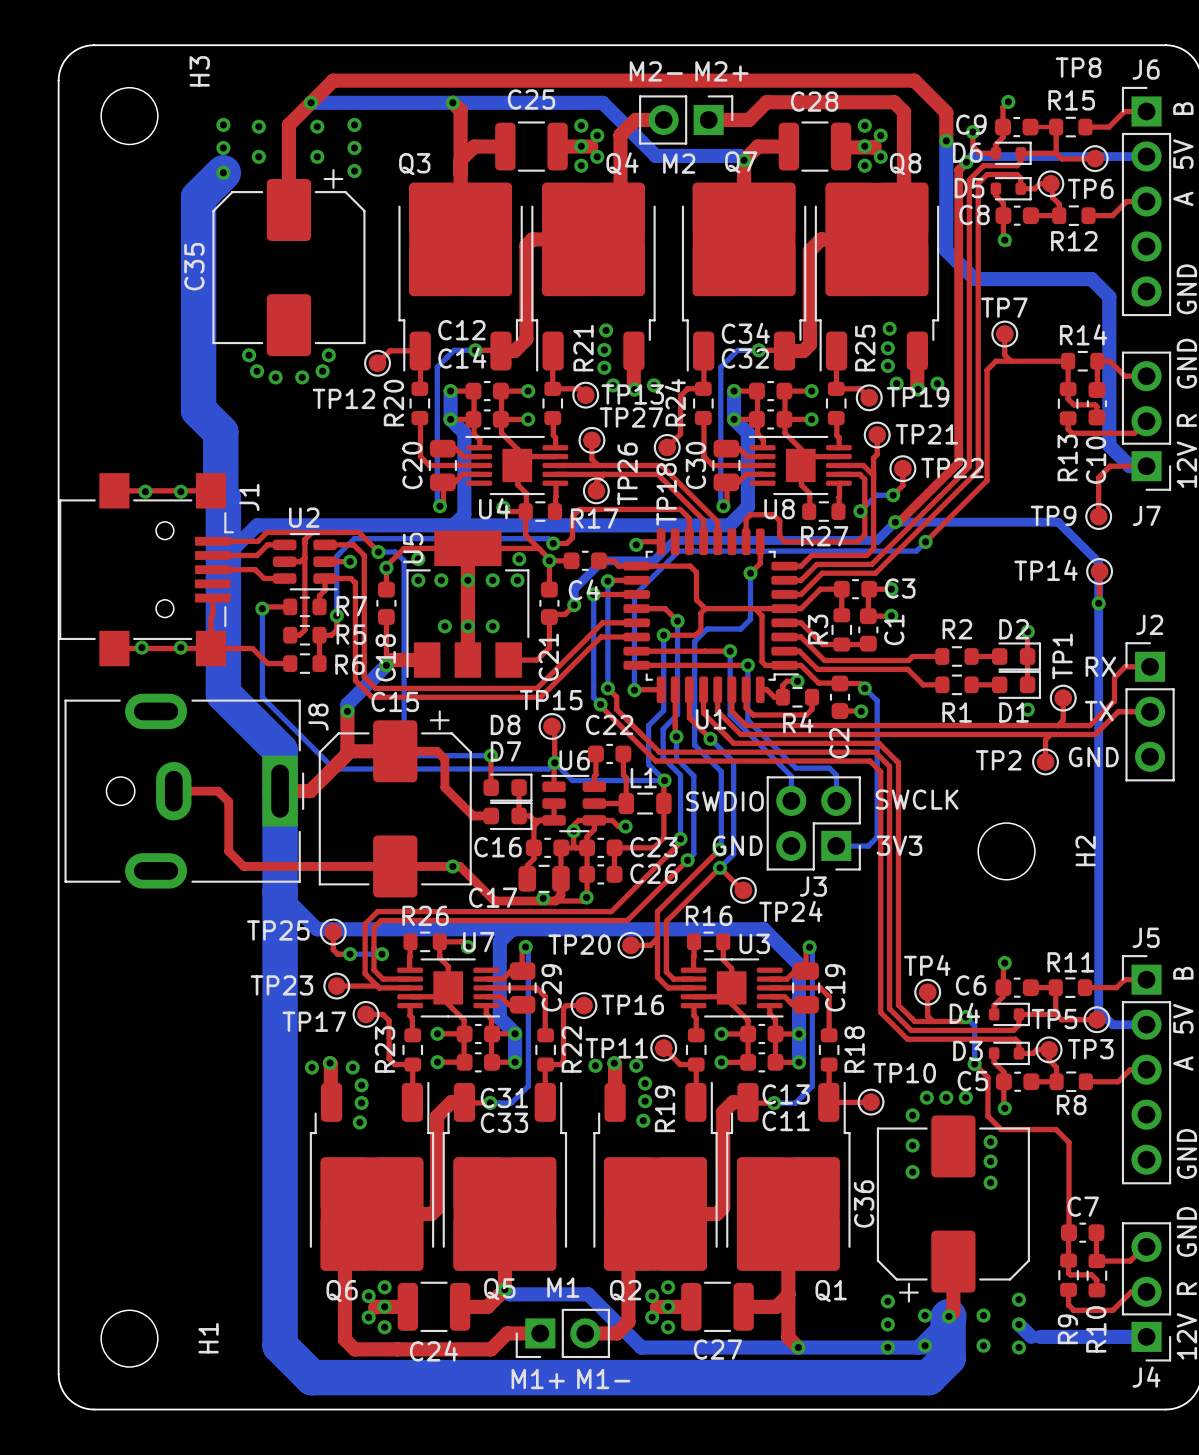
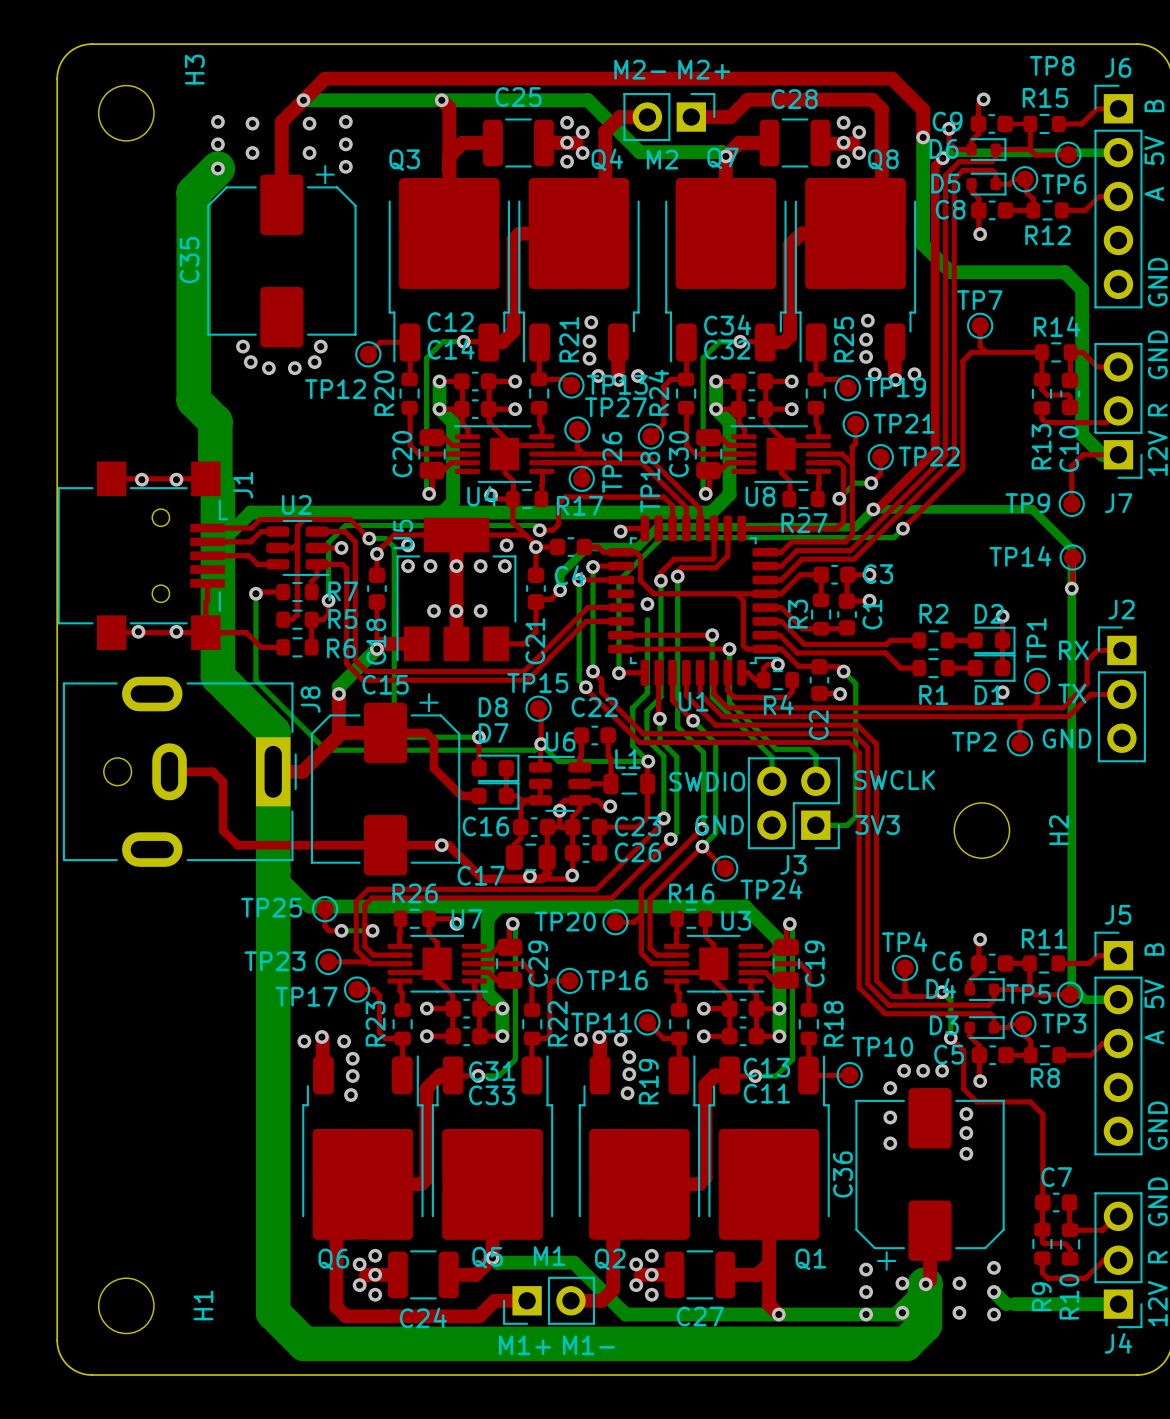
top track: none -> (714, 528) (714, 557) (712, 559) (674, 559) (660, 572) (660, 580)
top track: (746, 541) (746, 519) (750, 514) (773, 514) (779, 520) (779, 536) (785, 541) -> (741, 528) (765, 528)
top track: none -> (727, 528) (727, 555) (715, 567) (681, 567) (677, 571) (677, 576)
top track: (760, 541) (760, 563) (750, 573) -> none
top track: (652, 566) (690, 566) (696, 572) (696, 599) (705, 608) (700, 613) (700, 629) (695, 635) (663, 635) -> (636, 552) (640, 556) (640, 580) (653, 593) (688, 593)
bottom track: (750, 573) (750, 619) (740, 629) (707, 629) (694, 641) -> (677, 576) (677, 625)
via: (750, 573) -> none
via: none -> (677, 576)
bottom track: none -> (660, 580) (660, 605)
via: none -> (660, 580)
top track: (636, 608) (665, 608) (677, 621) -> none
via position: (677, 621) -> (647, 604)
via: (663, 635) -> none

